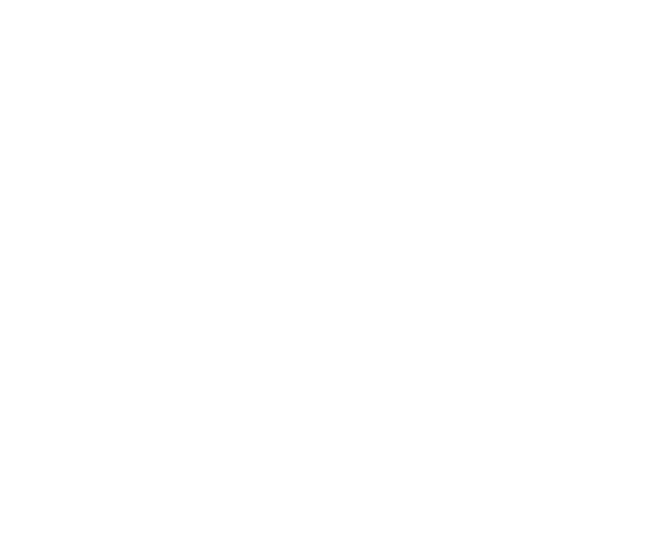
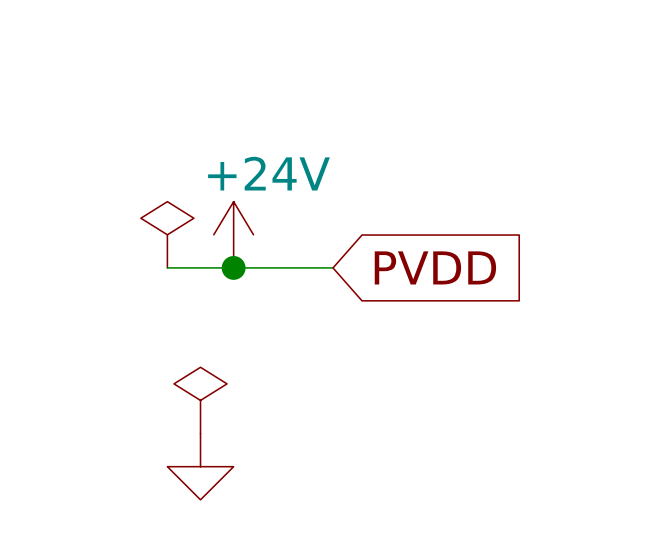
power symbol: none -> (167, 234)
power symbol: none -> +24V (233, 234)
wire: none -> (167, 267) (333, 267)
junction: none -> (233, 267)
global label: none -> PVDD (435, 267)
power symbol: none -> (200, 400)
power symbol: none -> (200, 466)

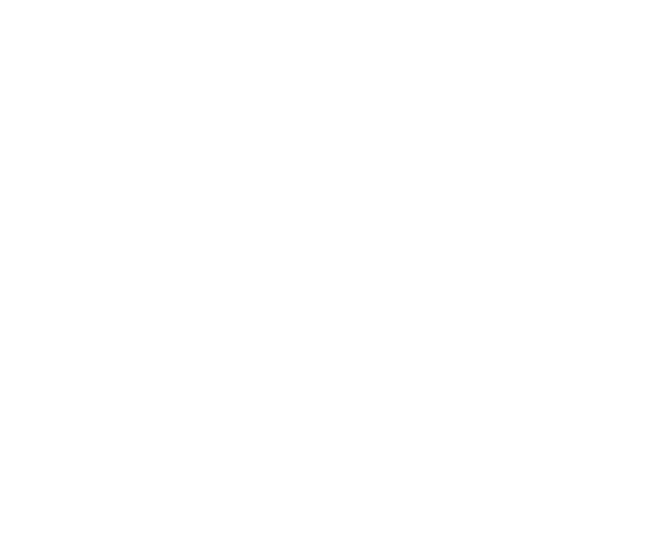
power symbol: (167, 234) -> none
power symbol: +24V (233, 234) -> none
wire: (167, 267) (333, 267) -> none
junction: (233, 267) -> none
global label: PVDD (435, 267) -> none
power symbol: (200, 400) -> none
power symbol: (200, 466) -> none

